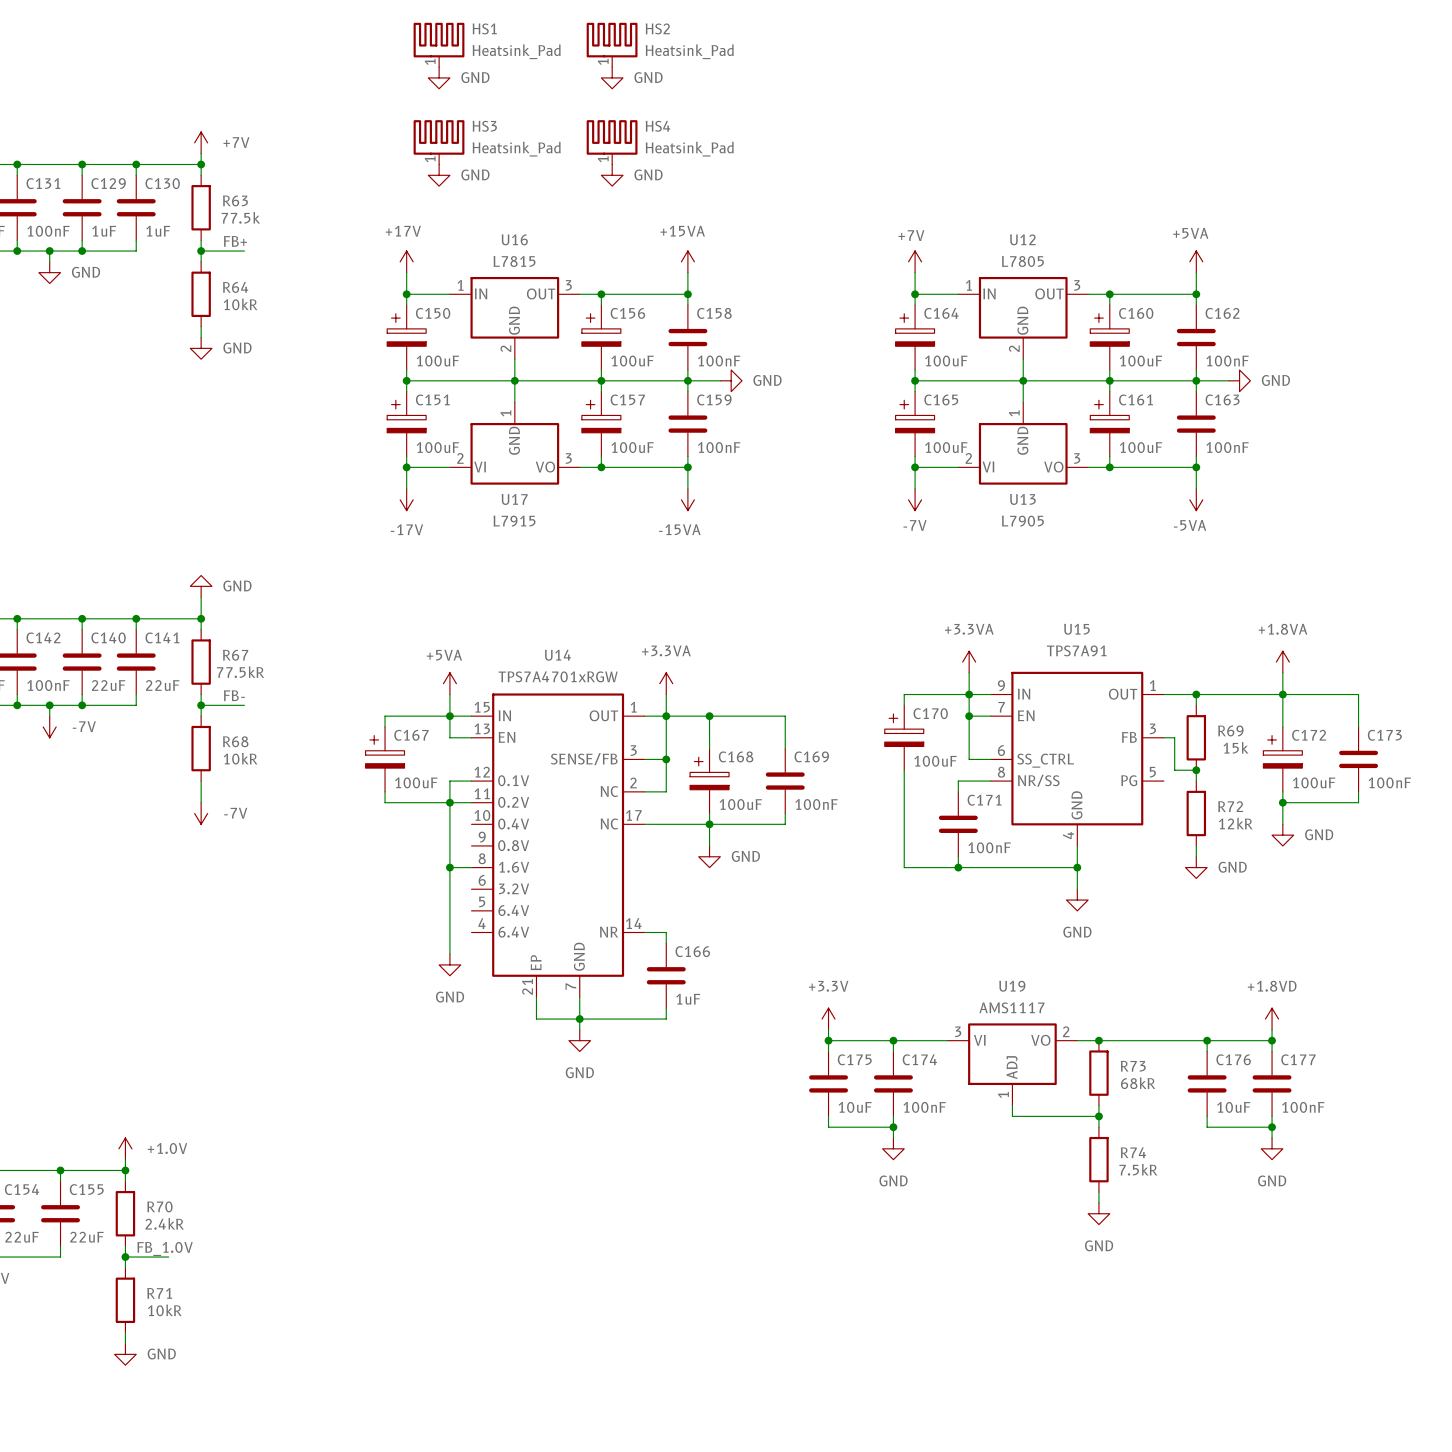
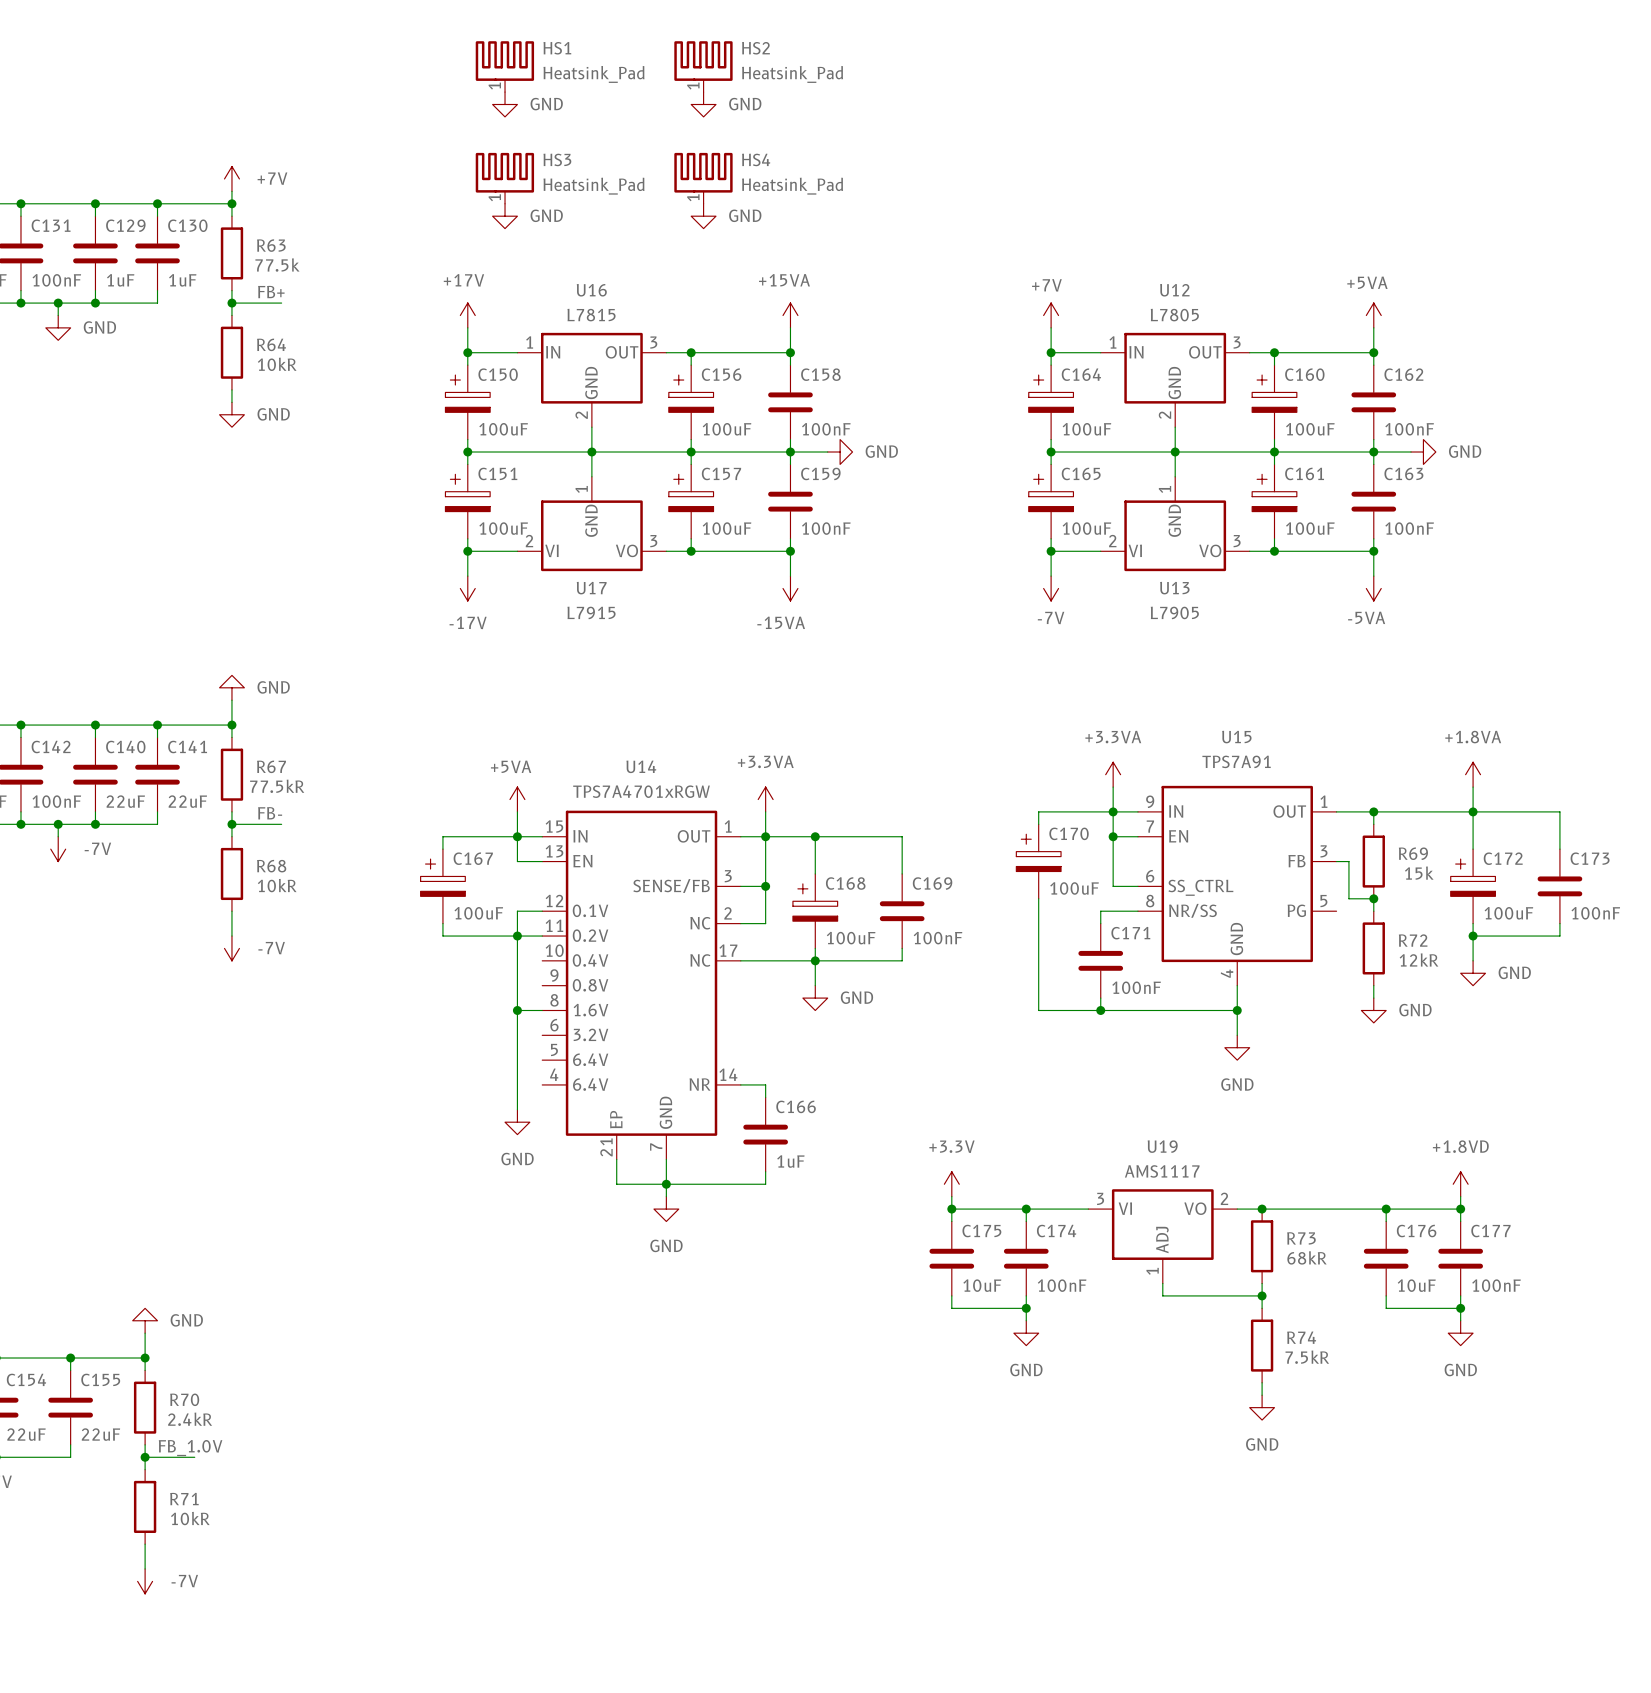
power symbol: none -> GND (145, 1320)
power symbol: +1.0V (125, 1148) -> none
power symbol: GND (125, 1354) -> none
power symbol: none -> -7V (145, 1581)

